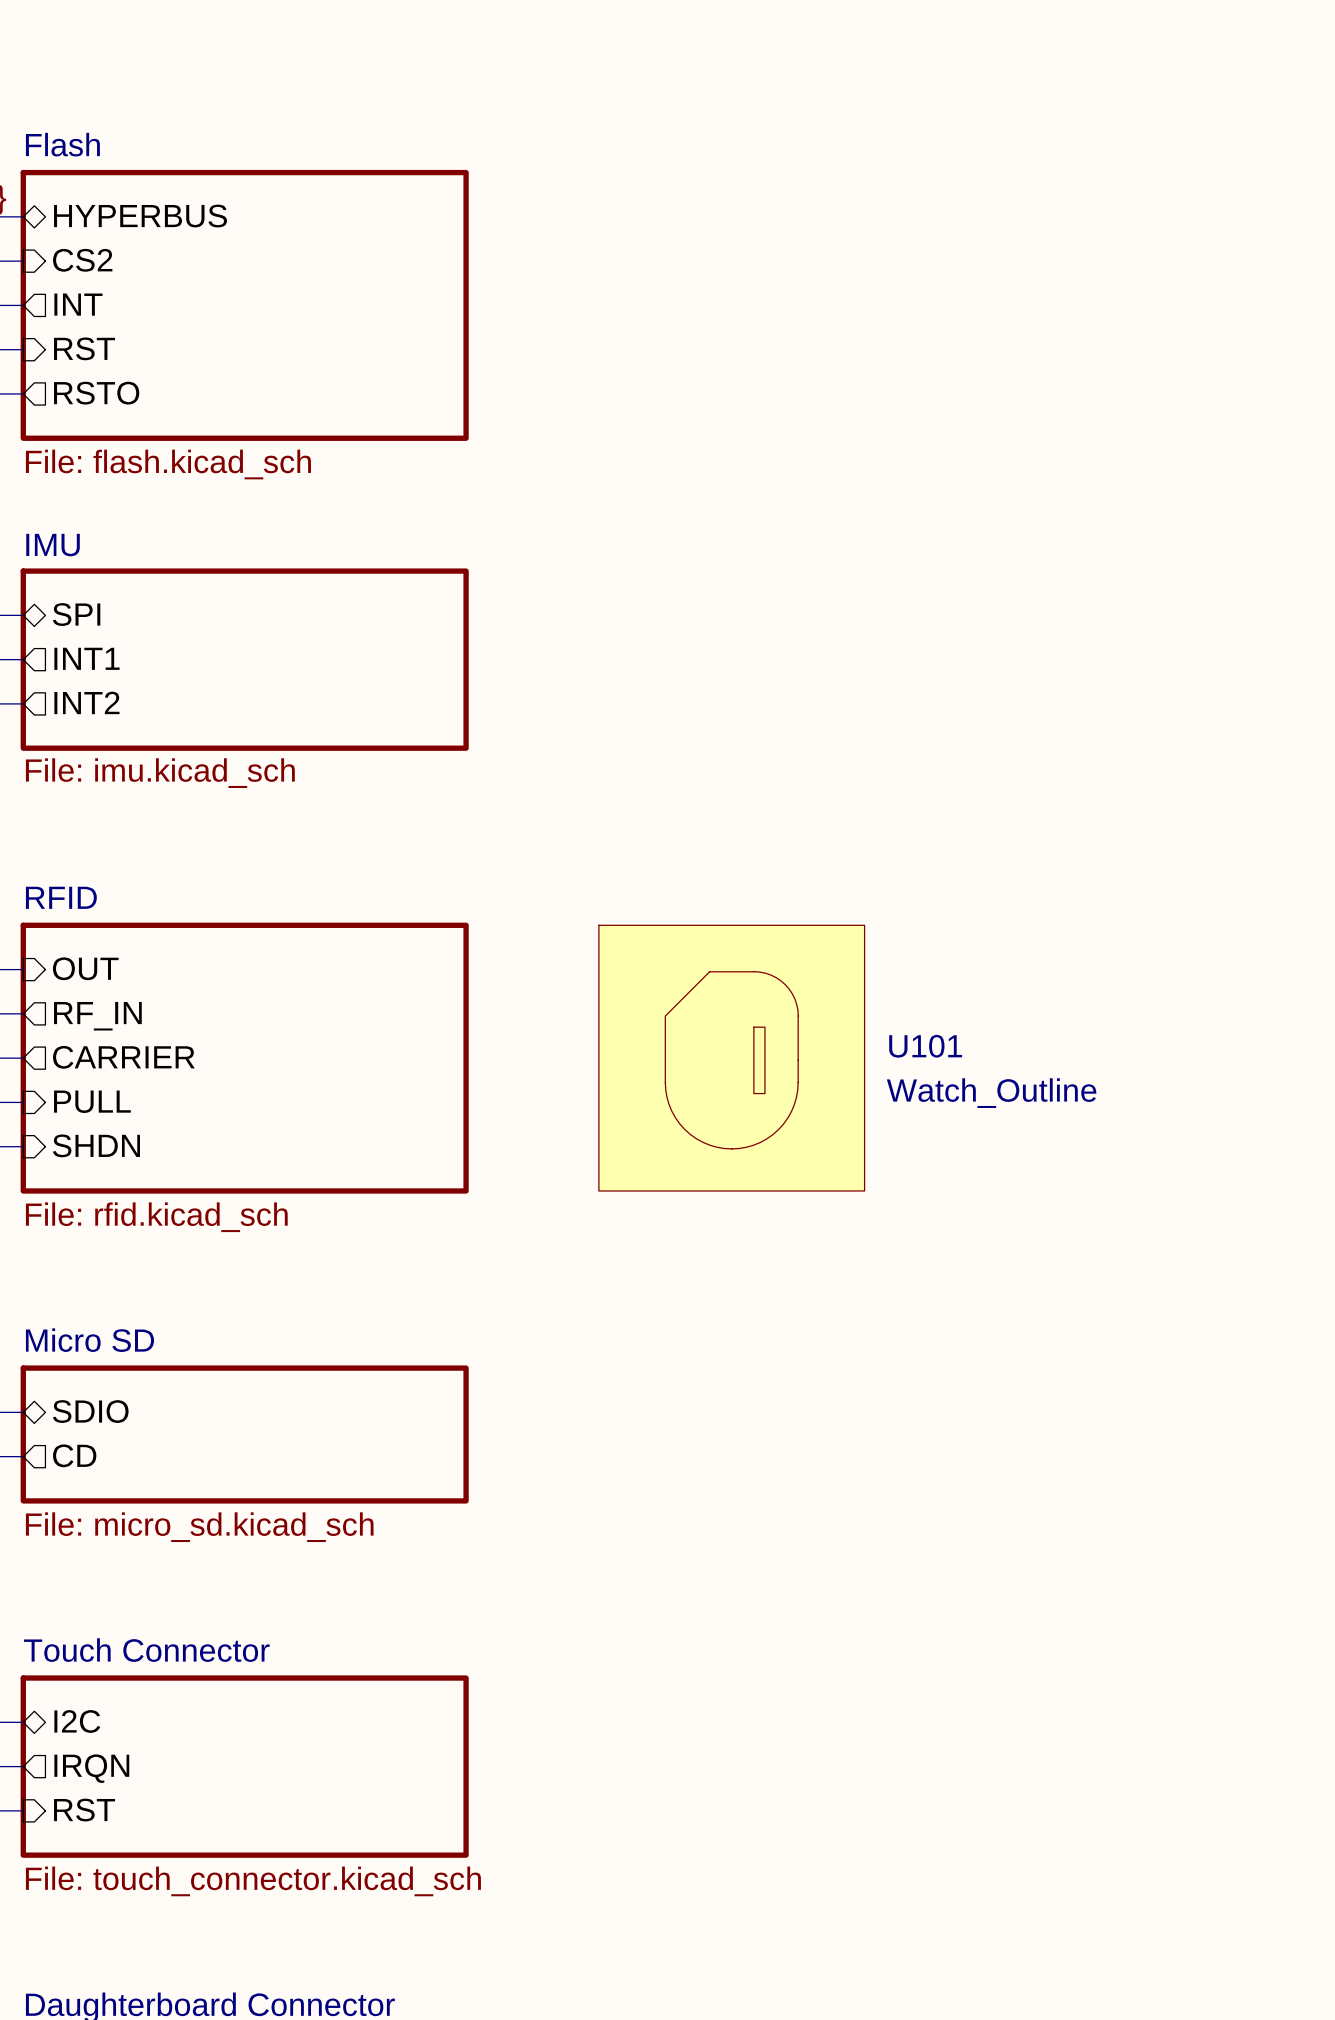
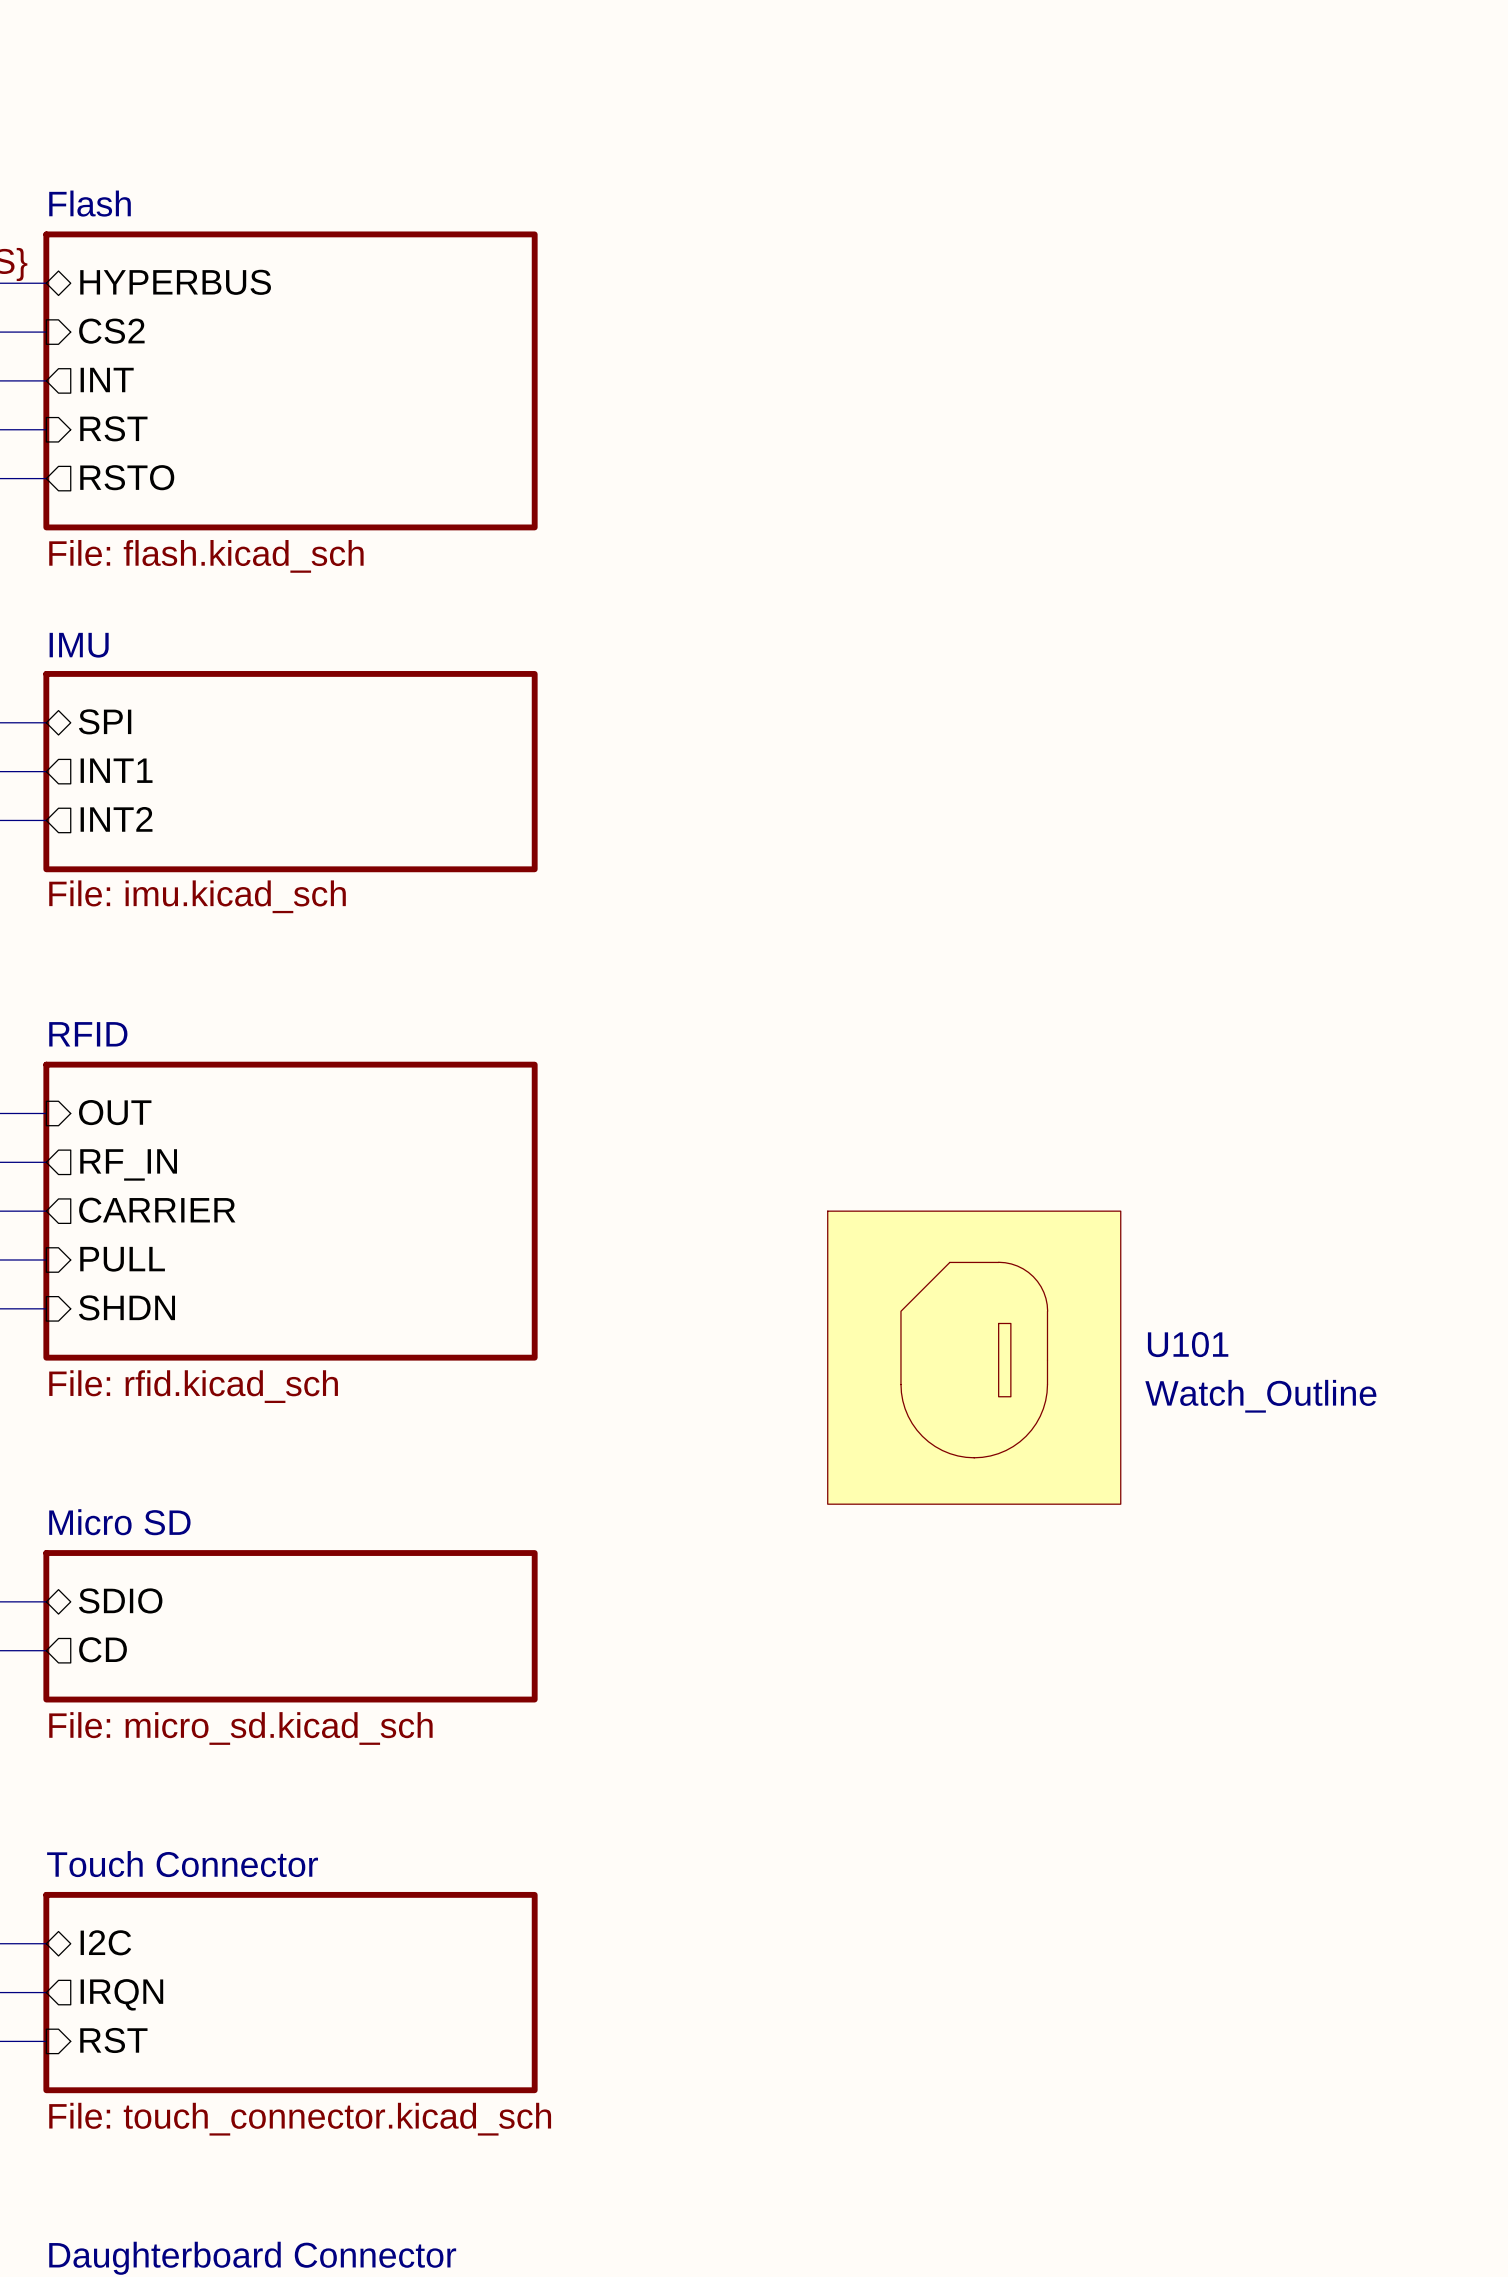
U101 position: (731, 1058) -> (974, 1357)

